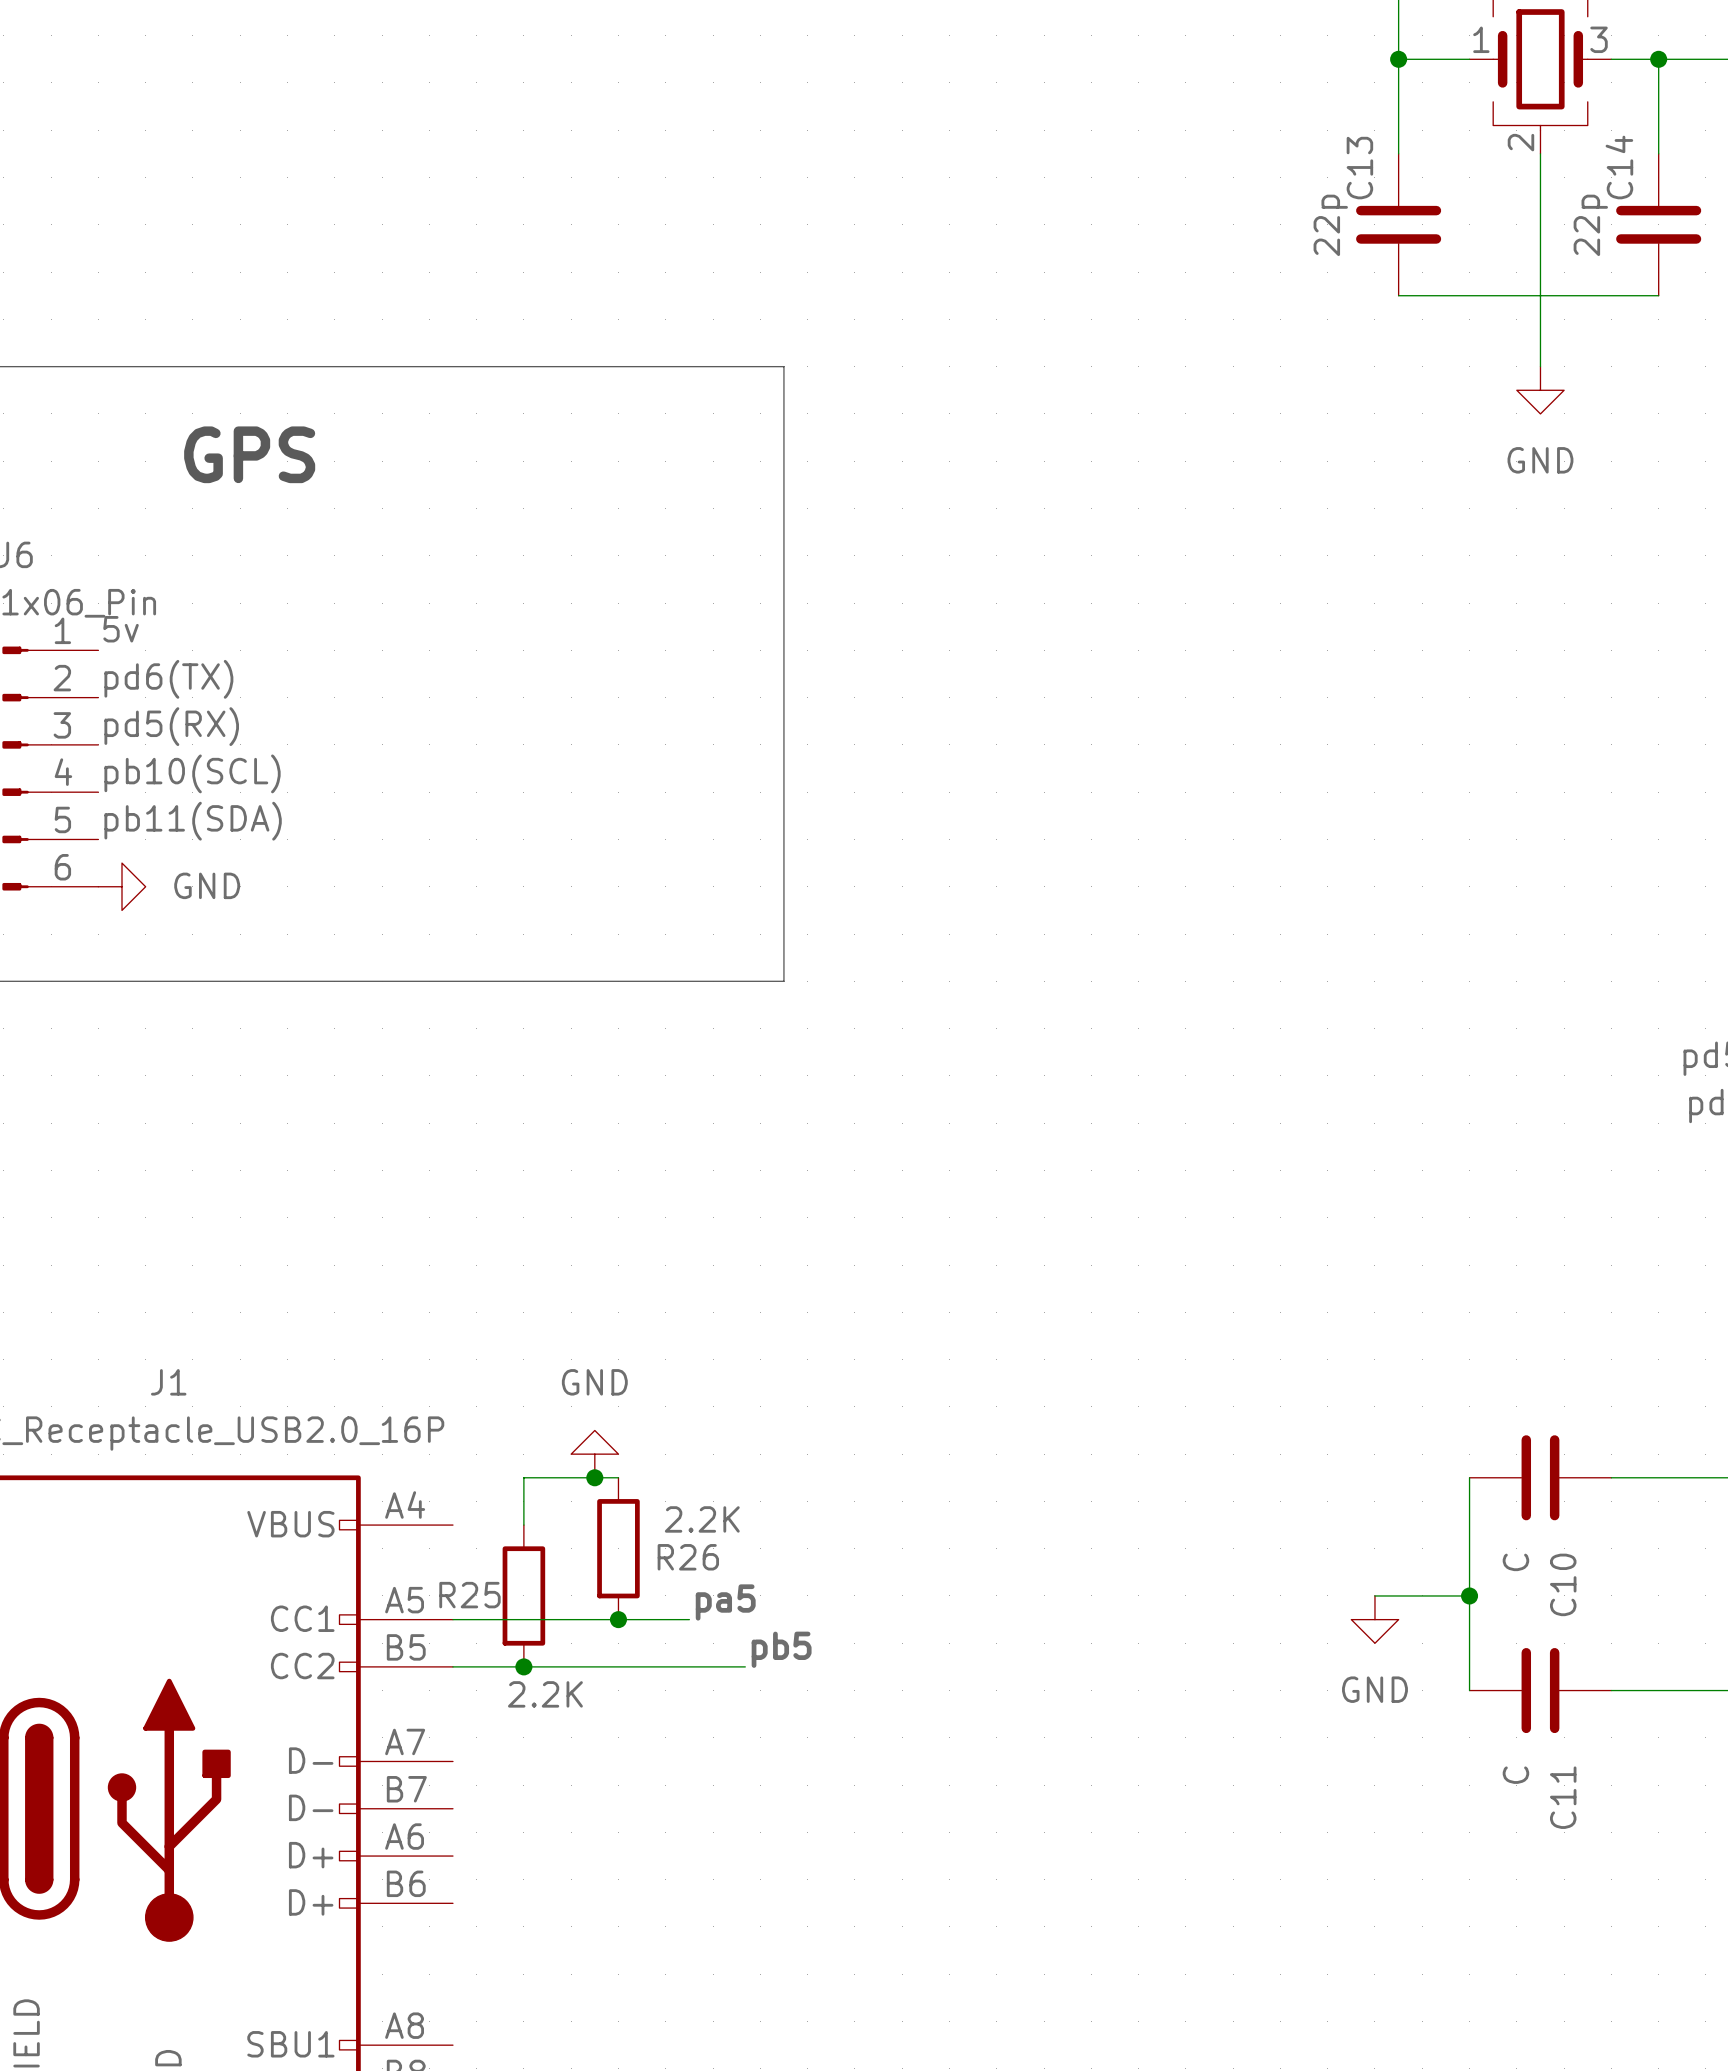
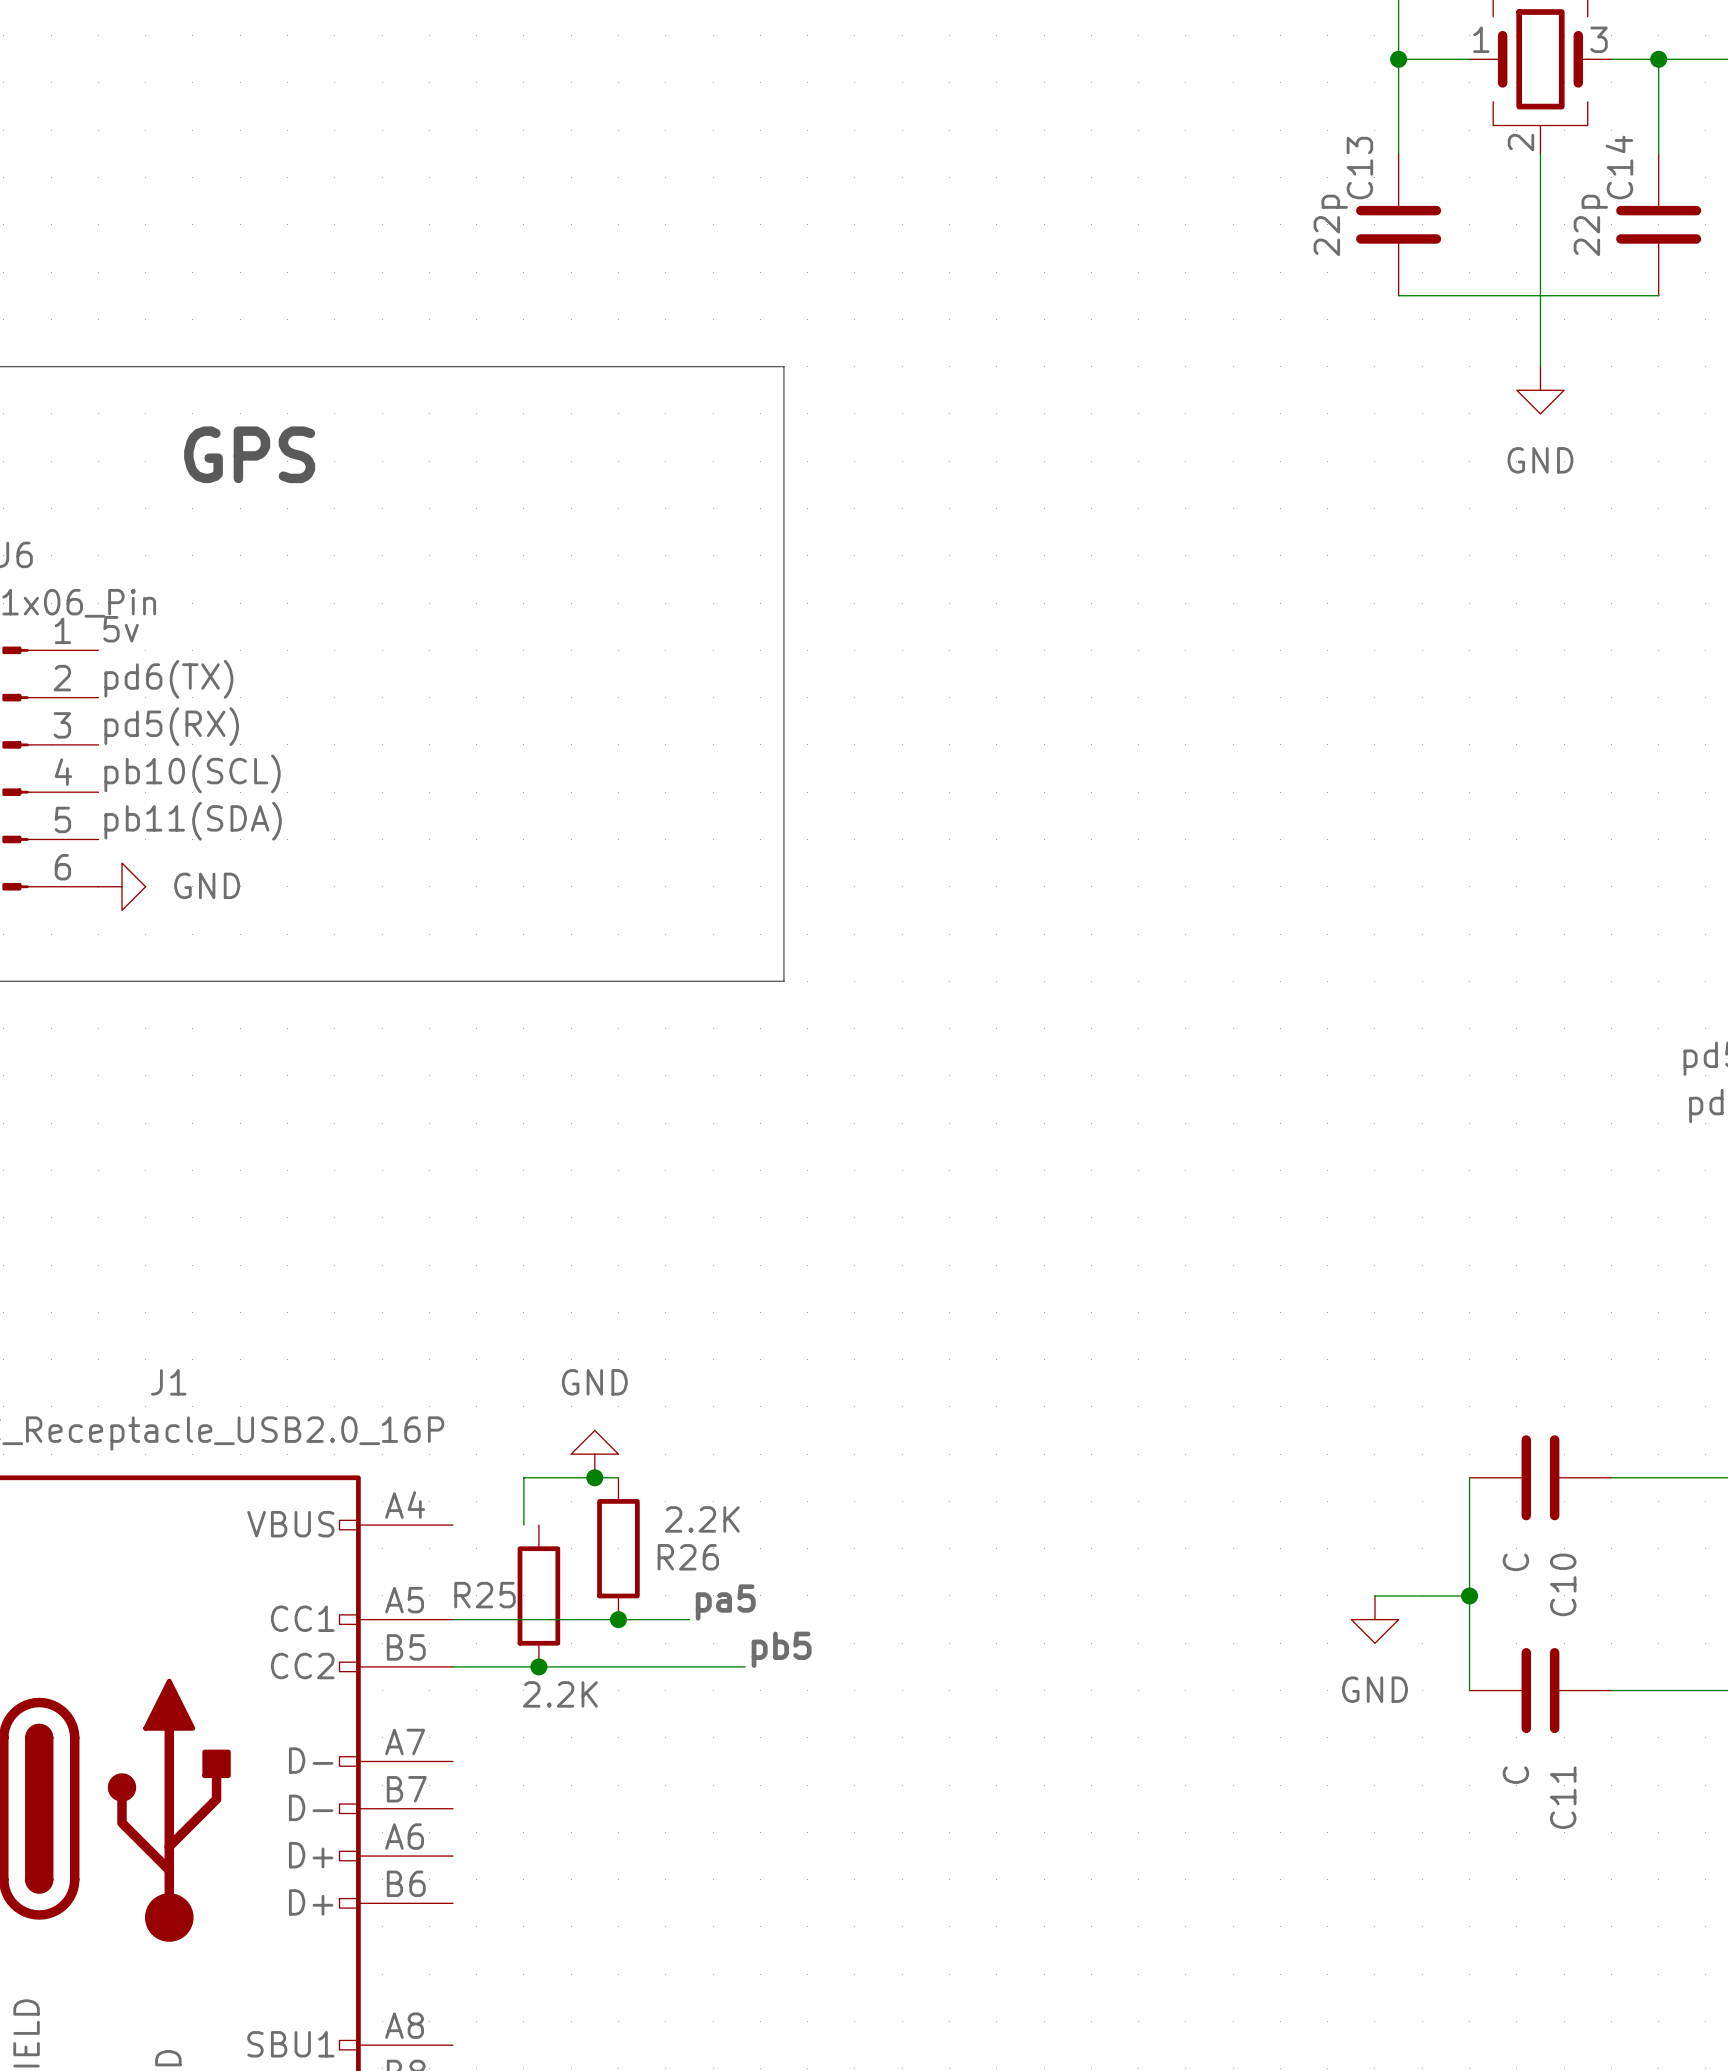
R25 position: (523, 1595) -> (538, 1595)
junction position: (523, 1666) -> (538, 1666)

